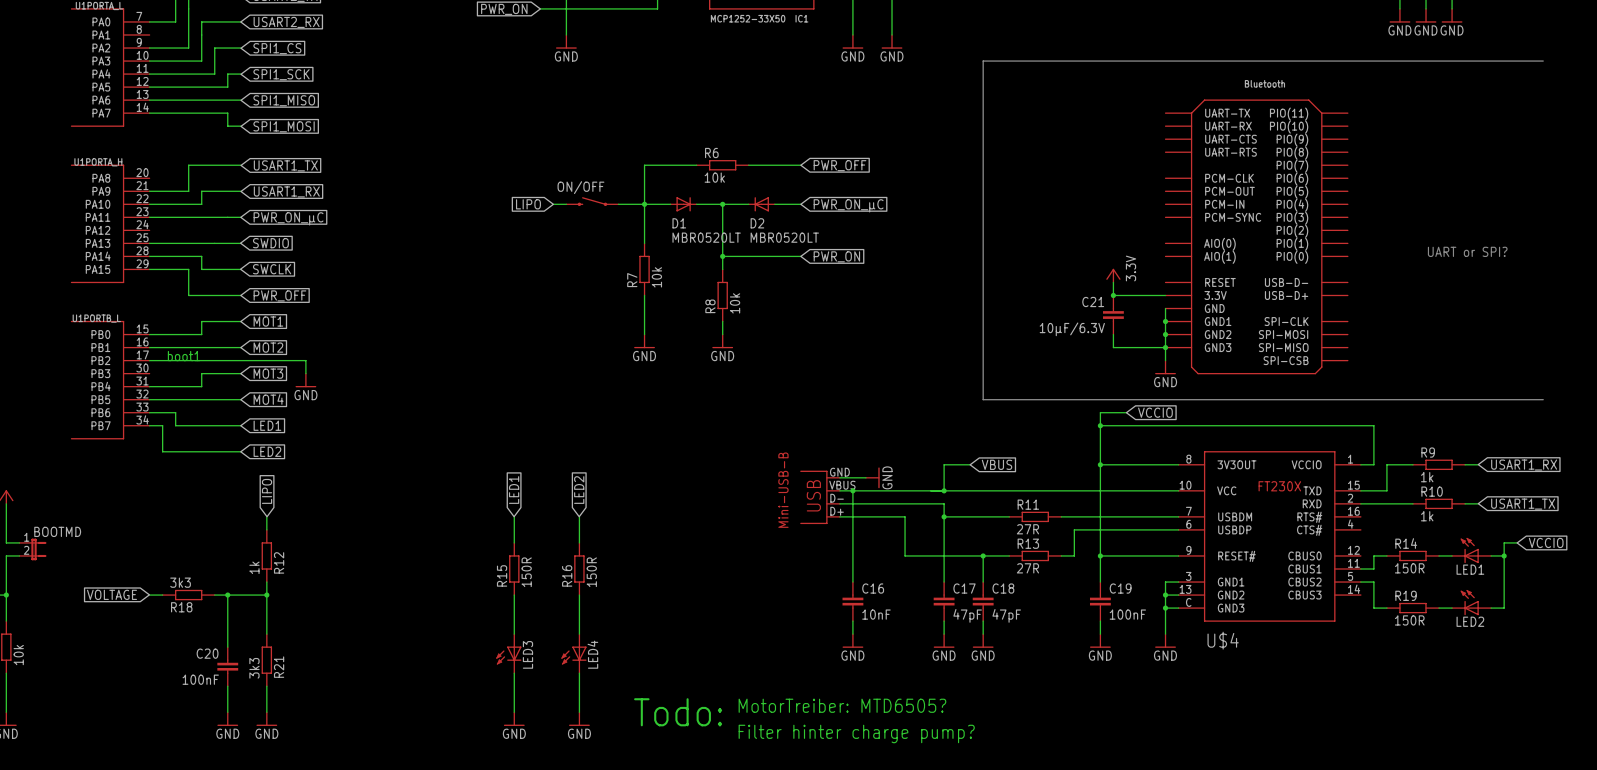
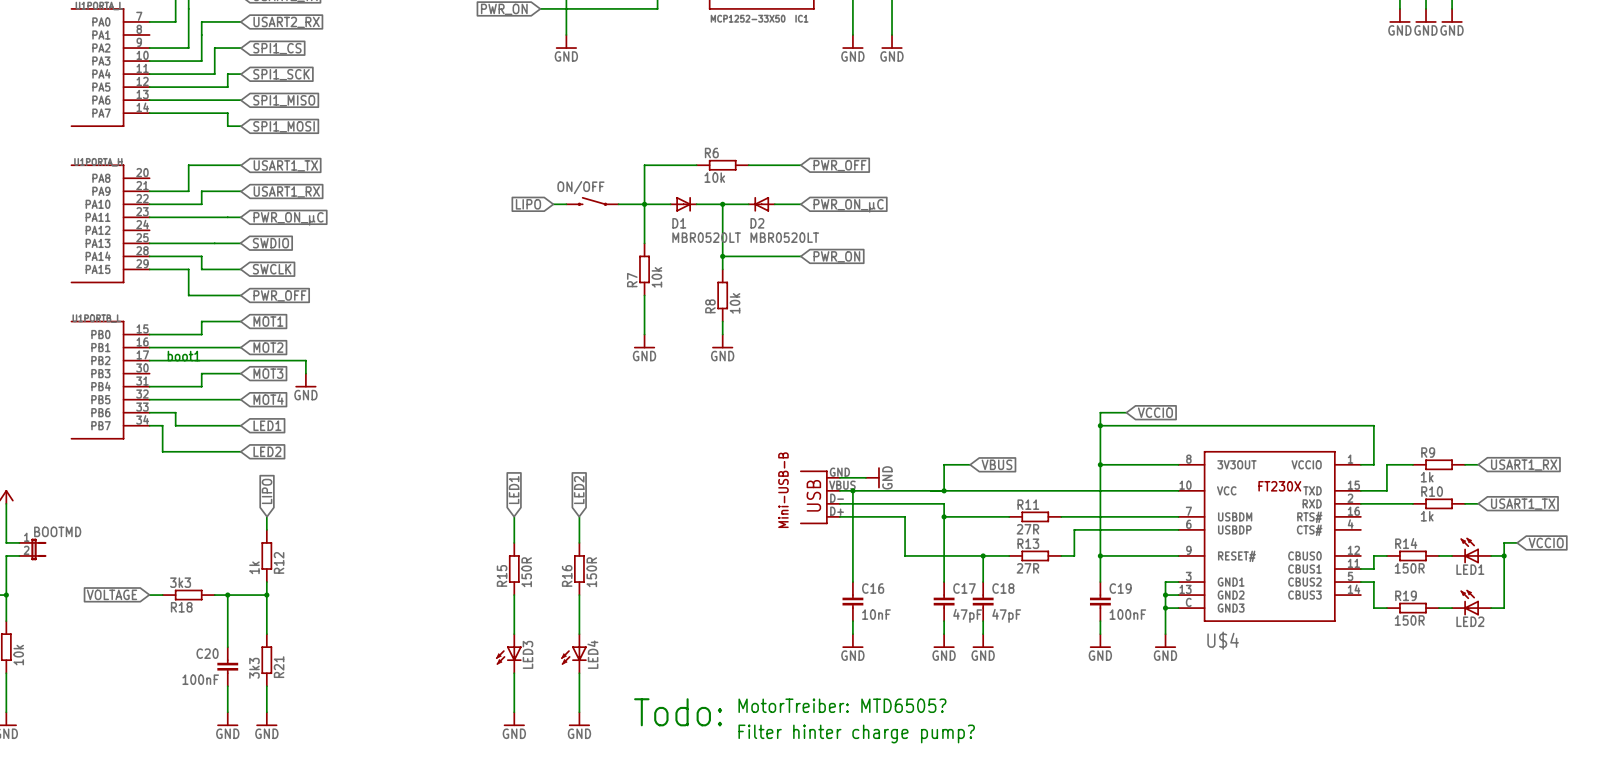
line: (1543, 61) (983, 61) (983, 399) (1543, 399) -> none
part: (1256, 236) -> none
text: UART or SPI? (1467, 251) -> none
power symbol: 3.3V (1113, 275) -> none
wire: (1113, 282) (1113, 295) (1165, 295) -> none
junction: (1113, 295) -> none
wire: (1165, 308) (1165, 360) -> none
C21: 10µF/6.3V (1113, 315) -> none
junction: (1165, 321) -> none
wire: (1113, 334) (1113, 347) (1165, 347) -> none
junction: (1165, 334) -> none
junction: (1165, 347) -> none
power symbol: GND (1165, 367) -> none

